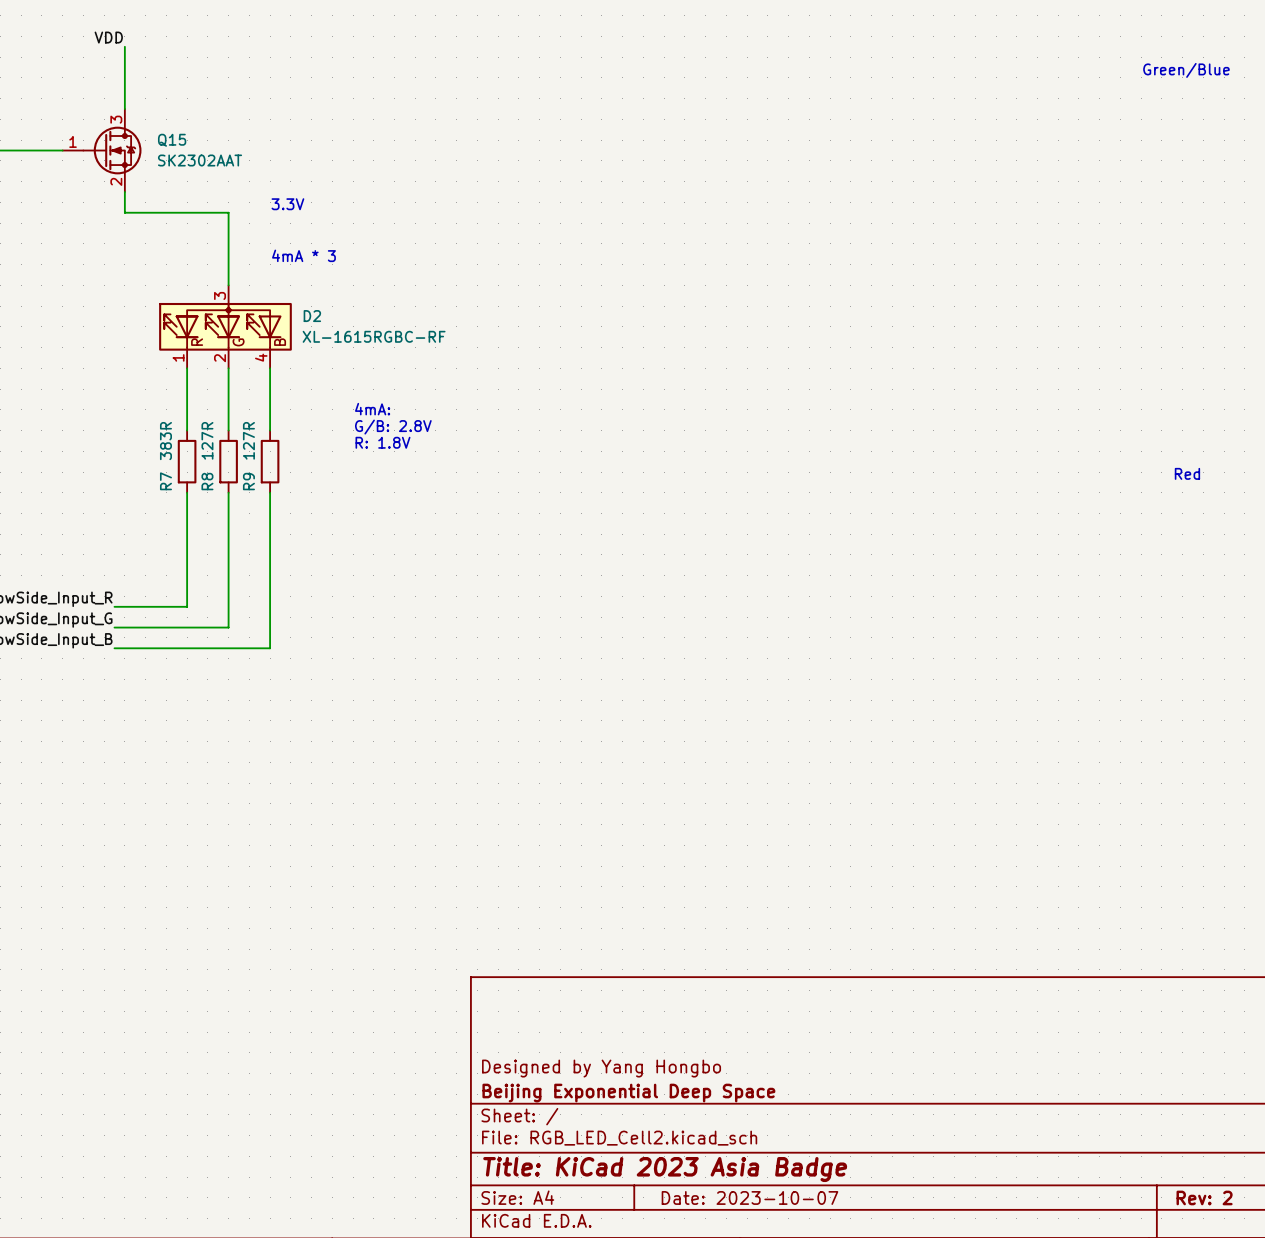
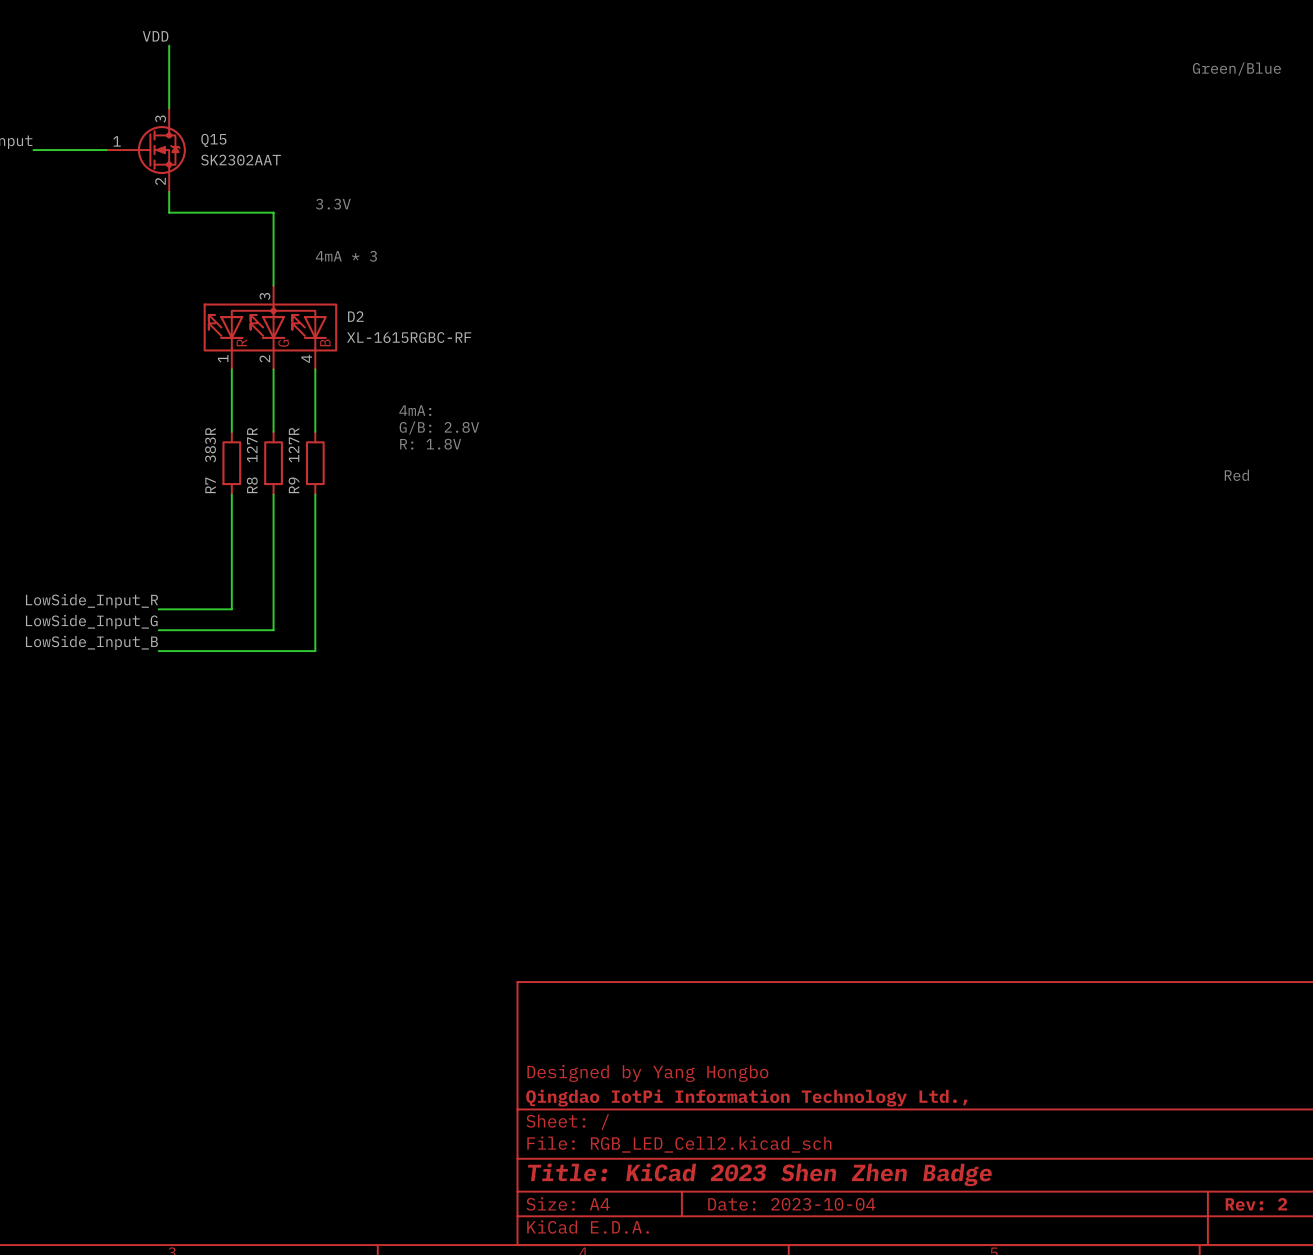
title block: Beijing Exponential Deep Space (628, 1093) -> Qingdao IotPi Information Technology Ltd., (746, 1098)
title block: Title: KiCad 2023 Asia Badge (665, 1169) -> Title: KiCad 2023 Shen Zhen Badge (759, 1174)
title block: Date: 2023-10-07 (749, 1197) -> Date: 2023-10-04 (791, 1204)

